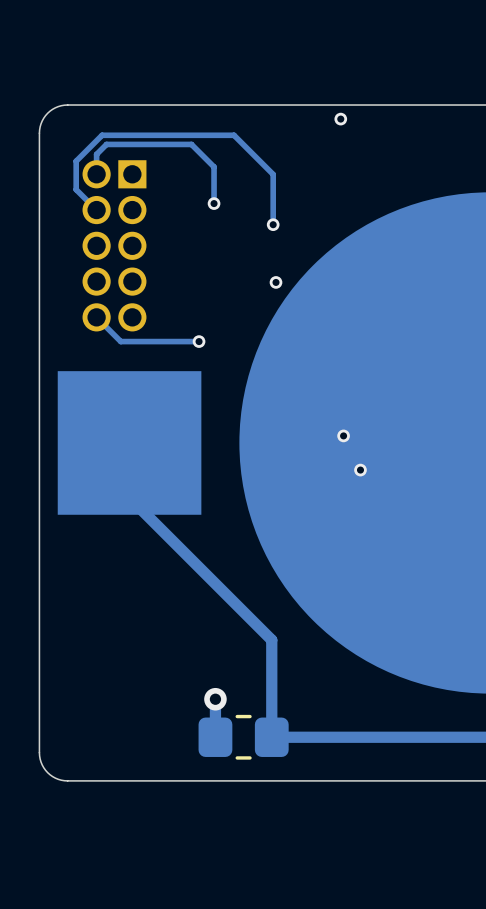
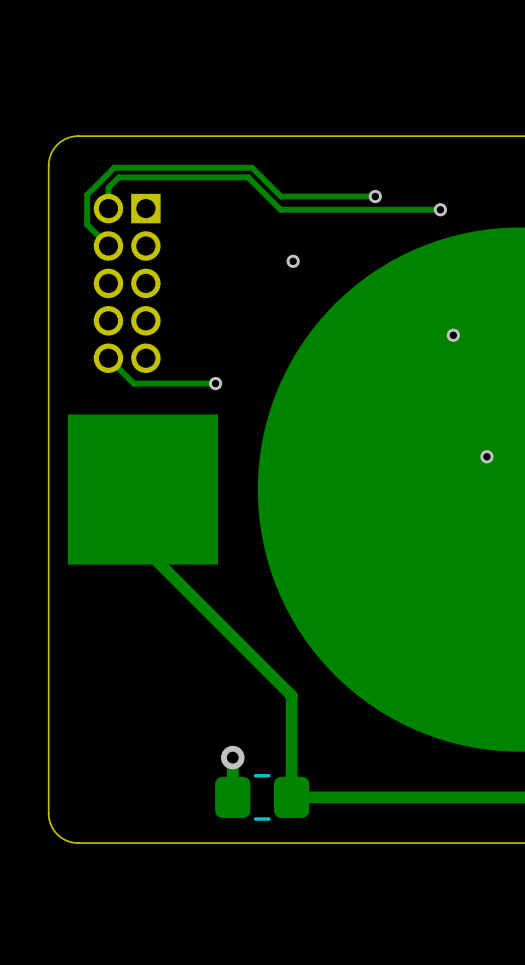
via position: (340, 119) -> (375, 196)
track: (191, 144) (214, 166) (214, 203) -> (207, 177) (248, 177) (280, 209) (440, 209)
track: (261, 162) (273, 174) (273, 224) -> (280, 196) (375, 196)
via: none -> (440, 209)
via: (214, 203) -> none
via: (276, 282) -> none
via: none -> (453, 335)
via: none -> (486, 456)
via: (343, 435) -> none
via: (360, 470) -> none

